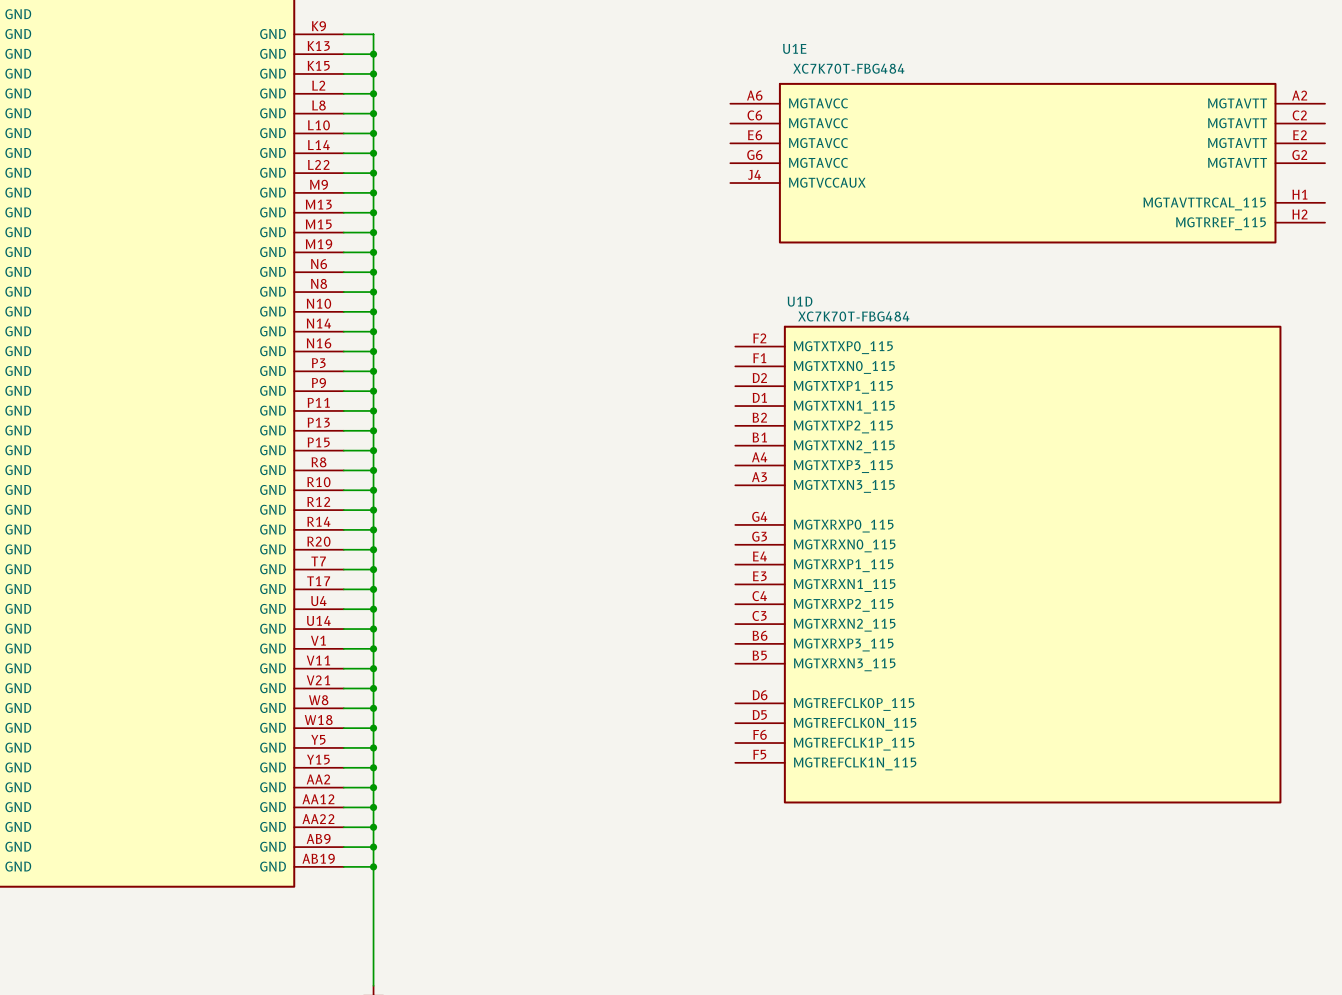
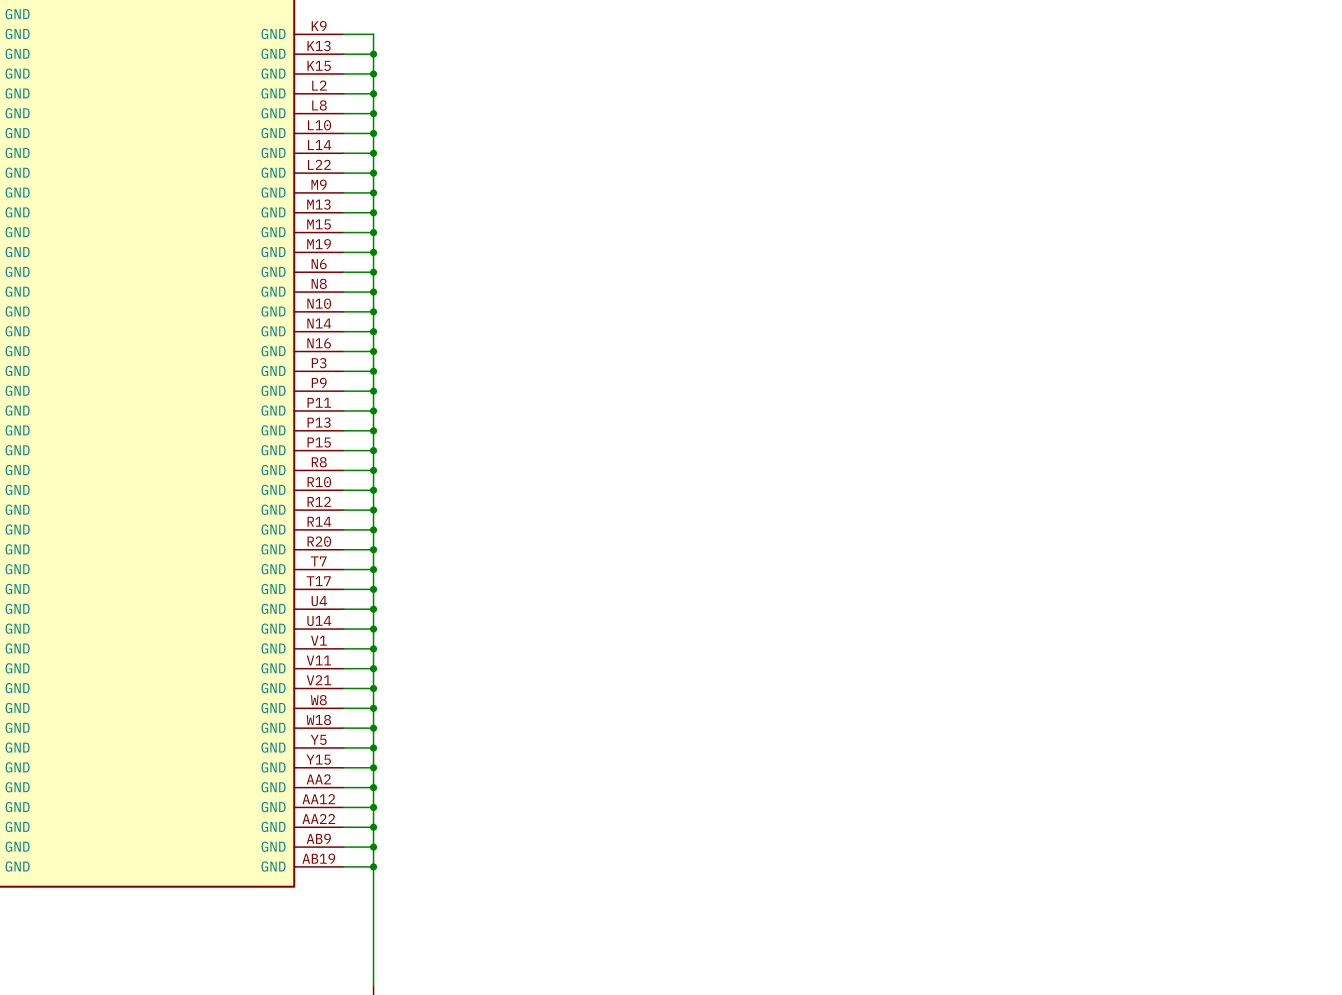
U1E: XC7K70T-FBG484 (1027, 163) -> none
U1D: XC7K70T-FBG484 (1008, 564) -> none

